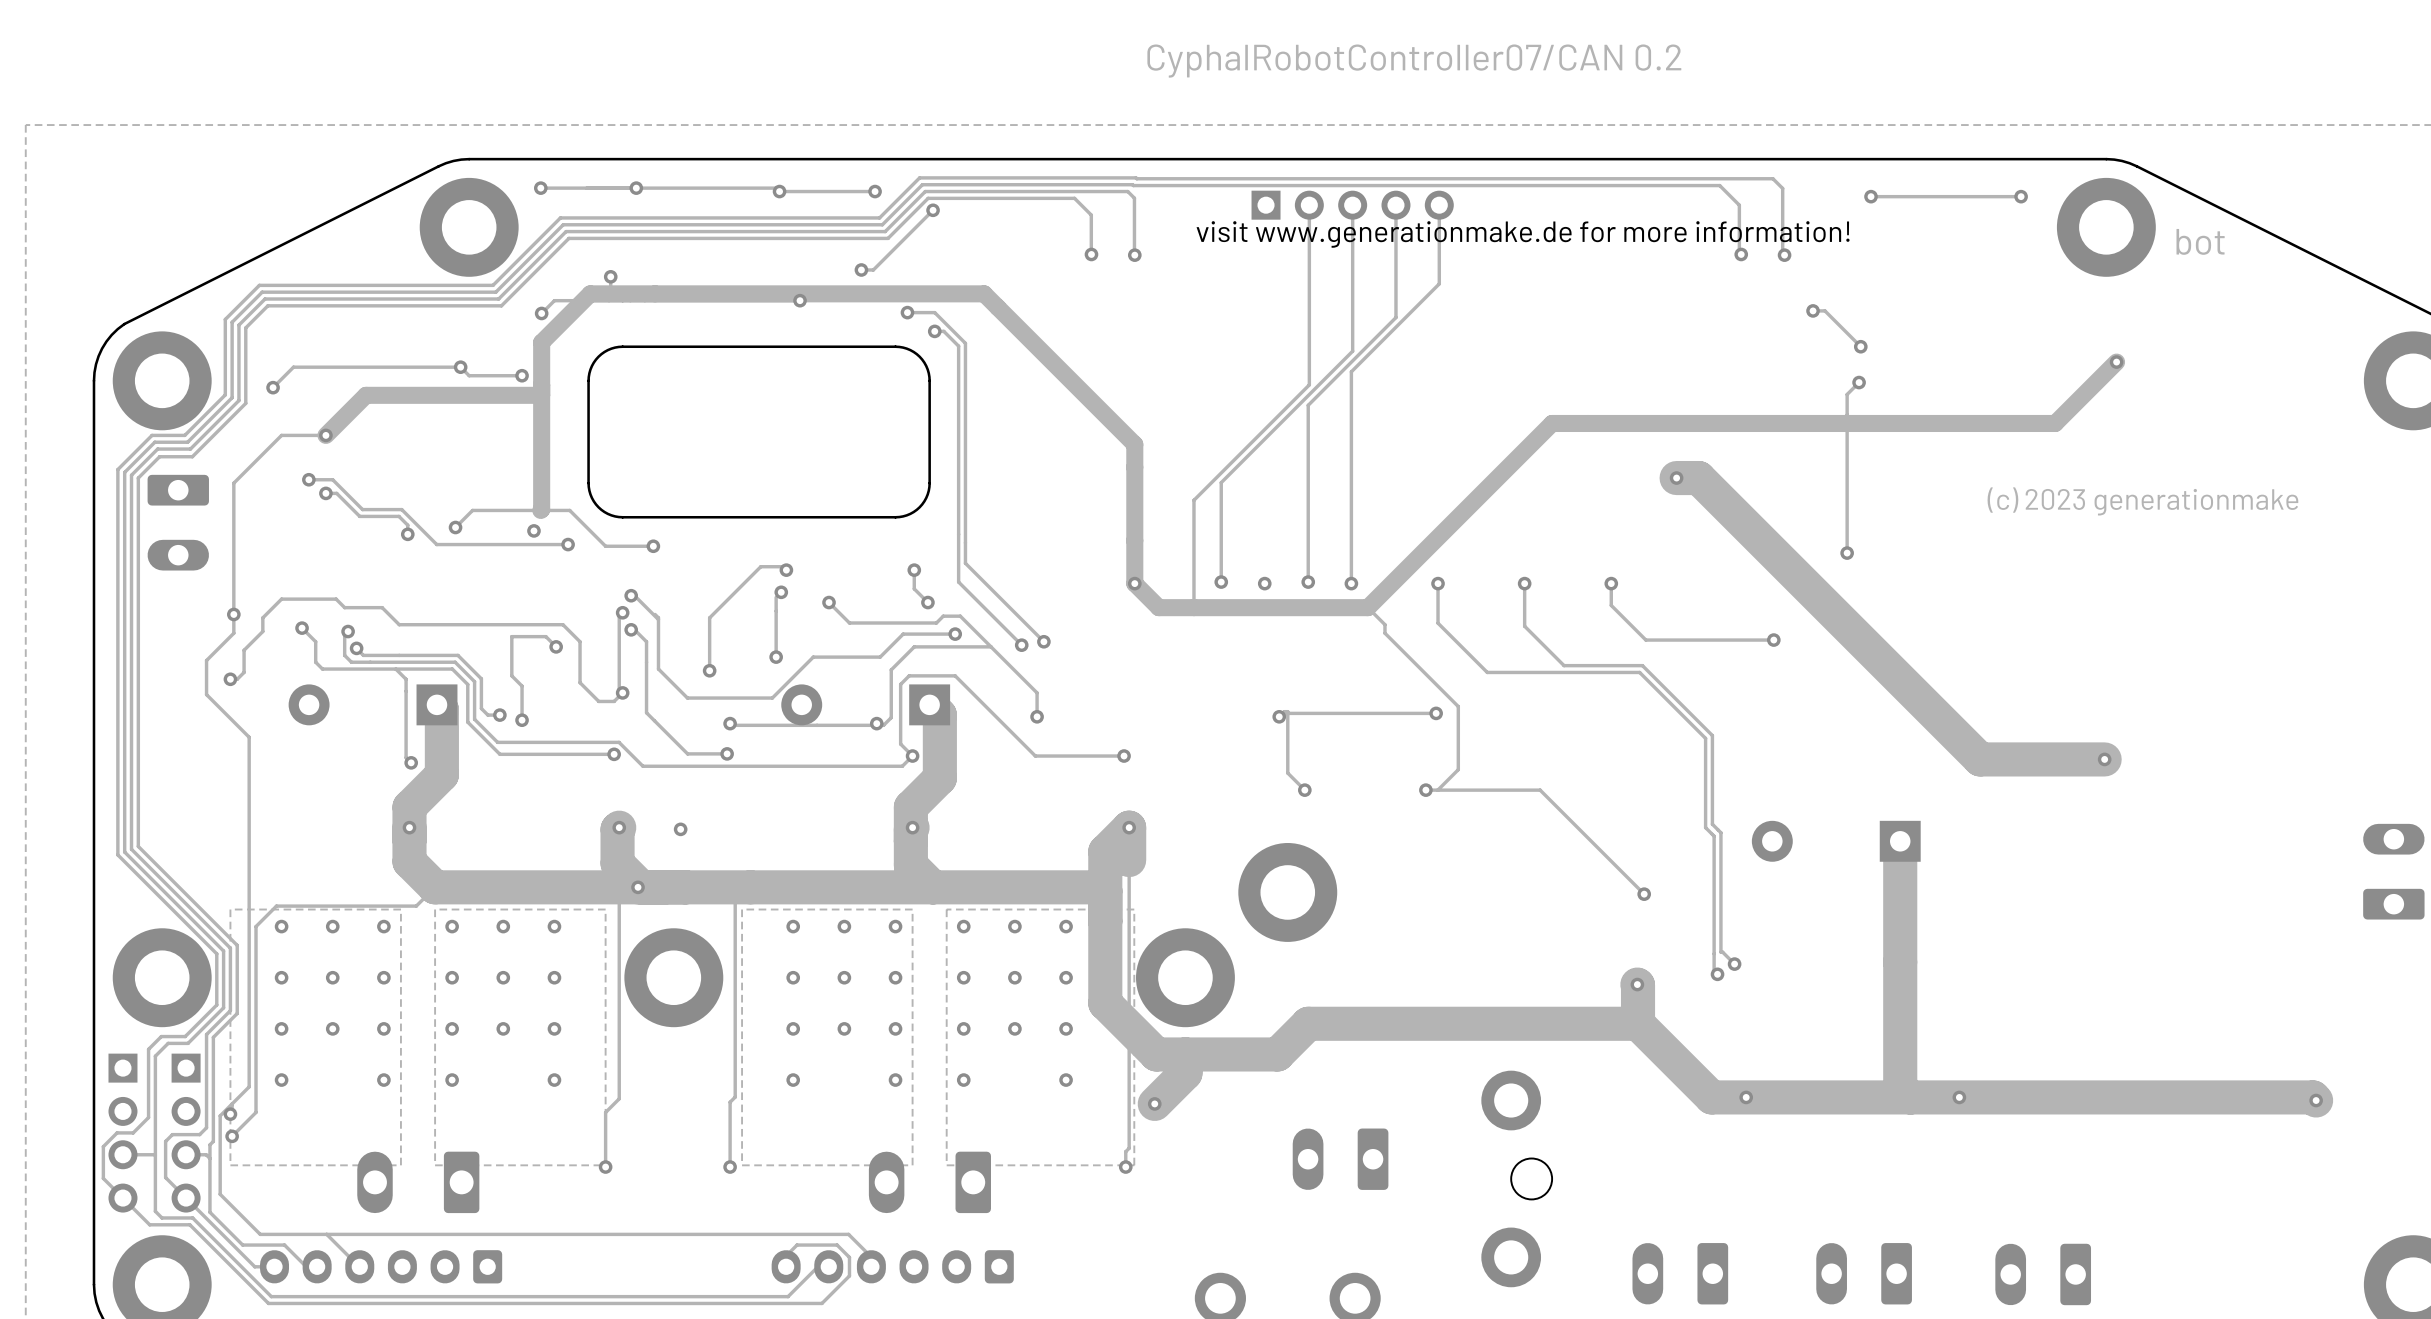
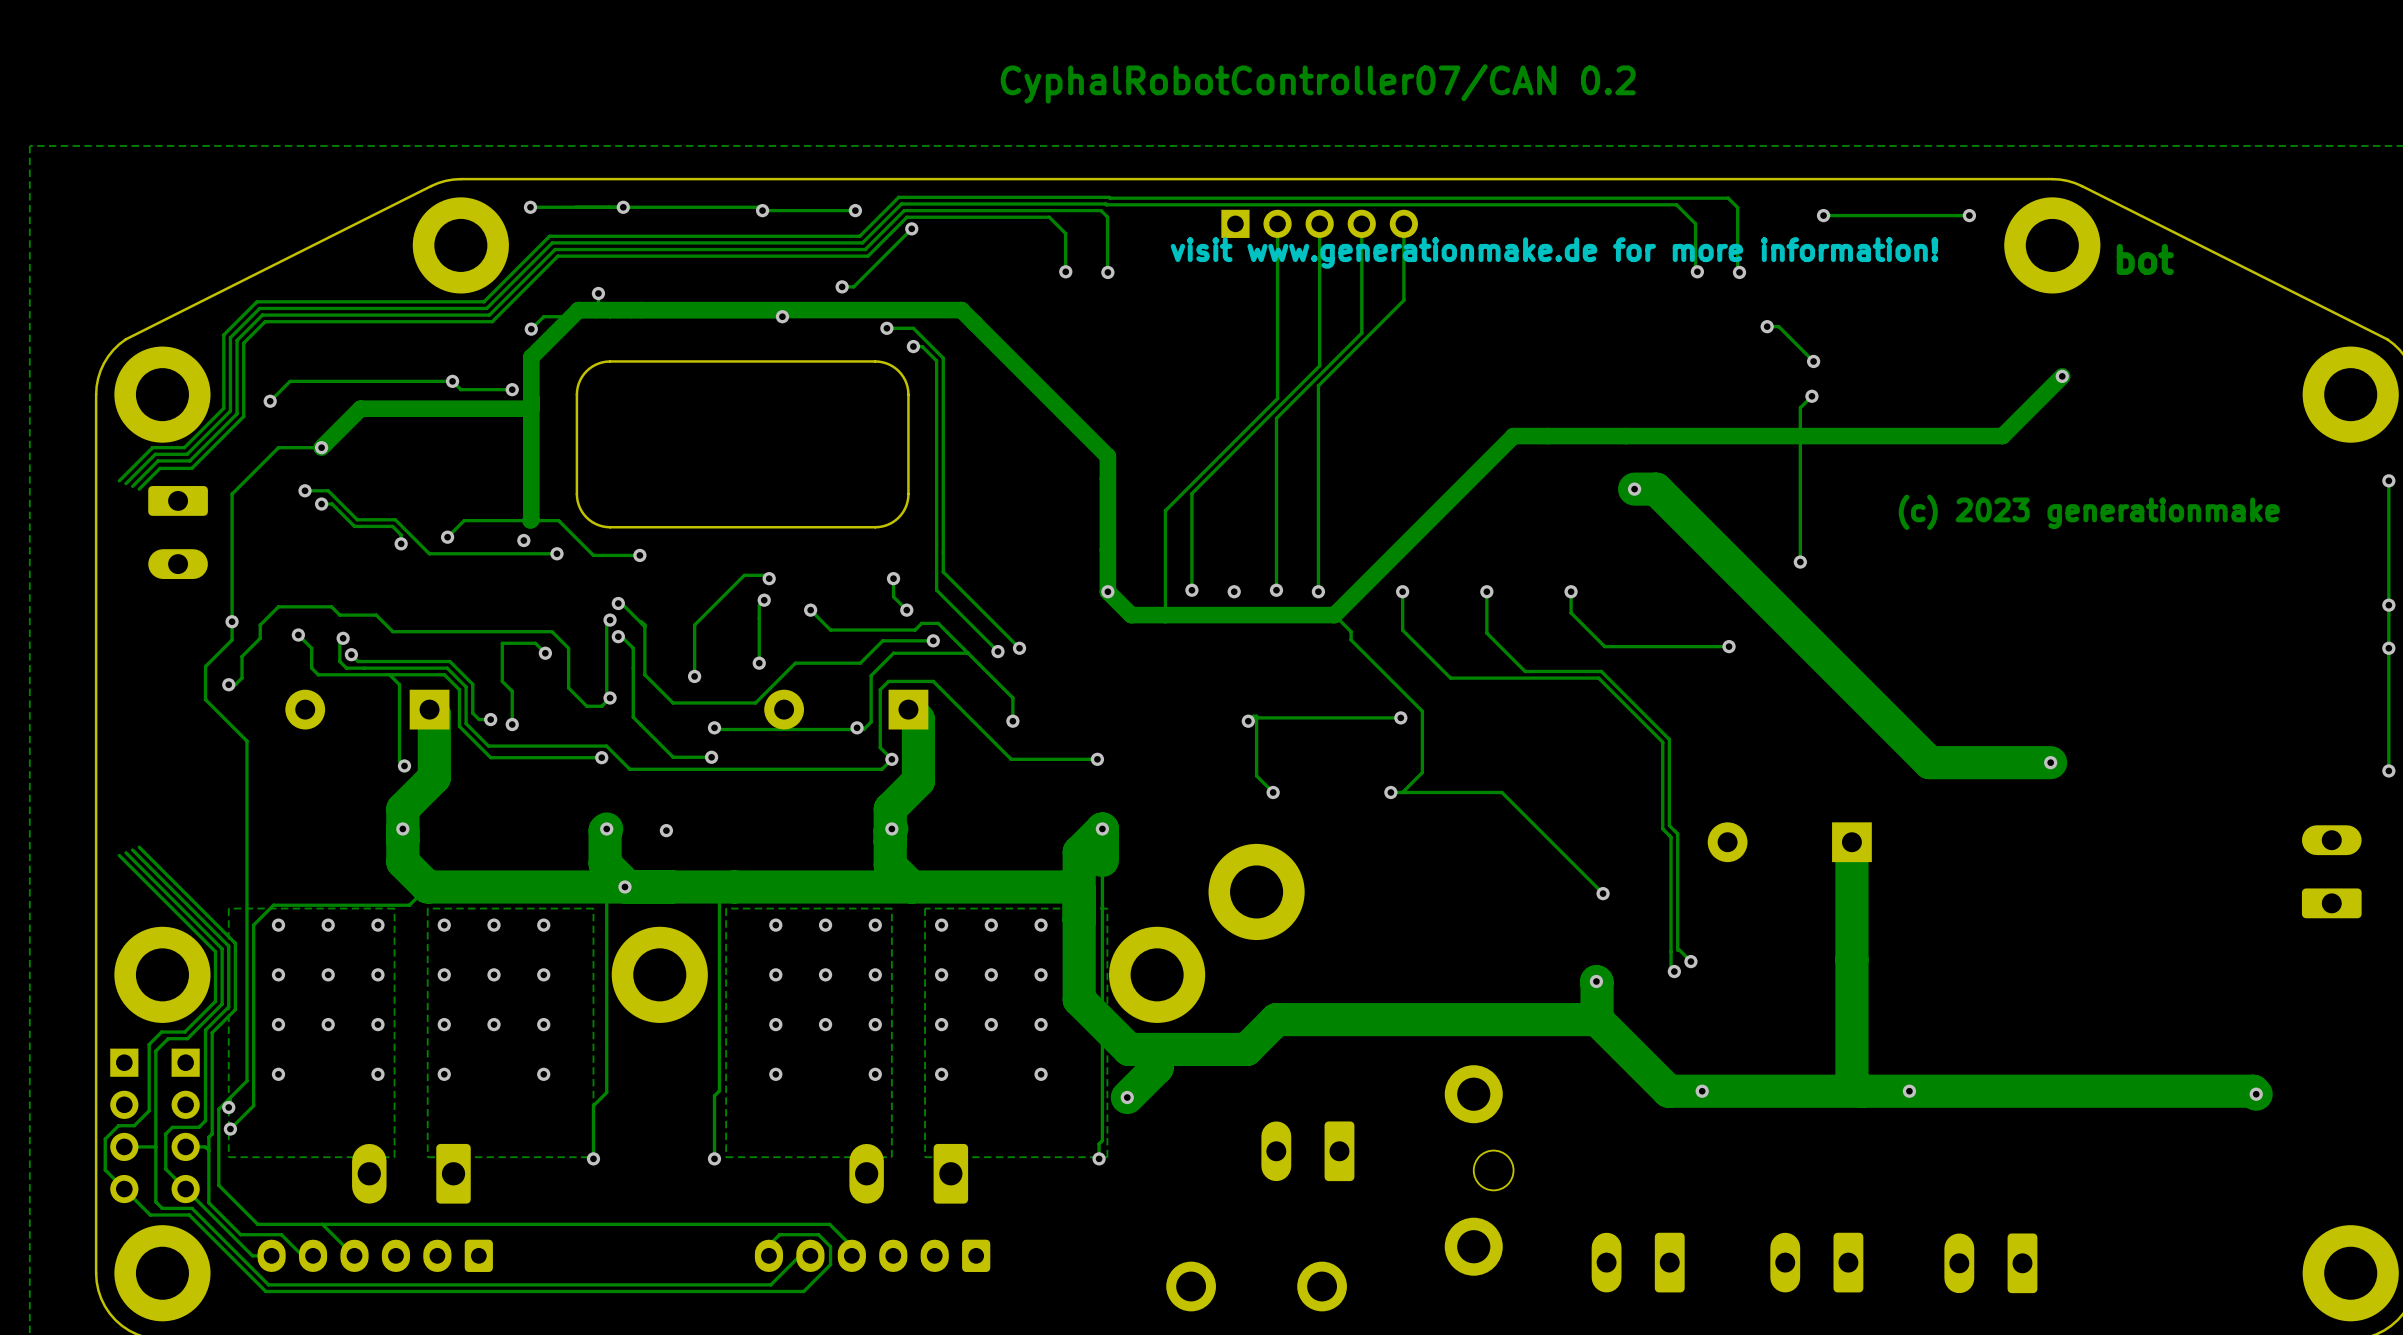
track: (117, 469) (117, 854) -> none
track: (124, 472) (124, 852) -> none
track: (131, 475) (131, 849) -> none
track: (138, 478) (138, 846) -> none

